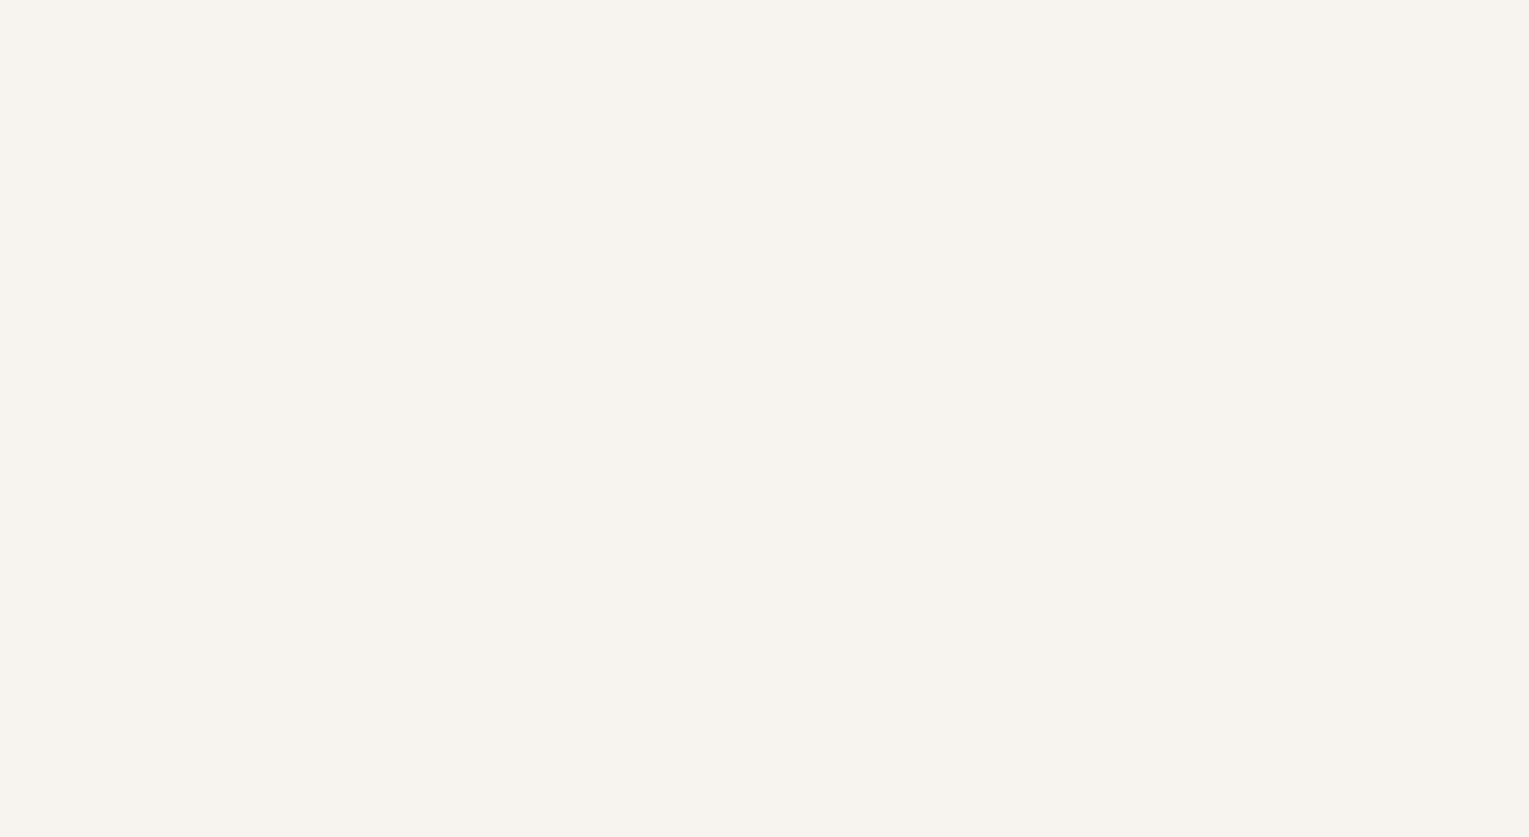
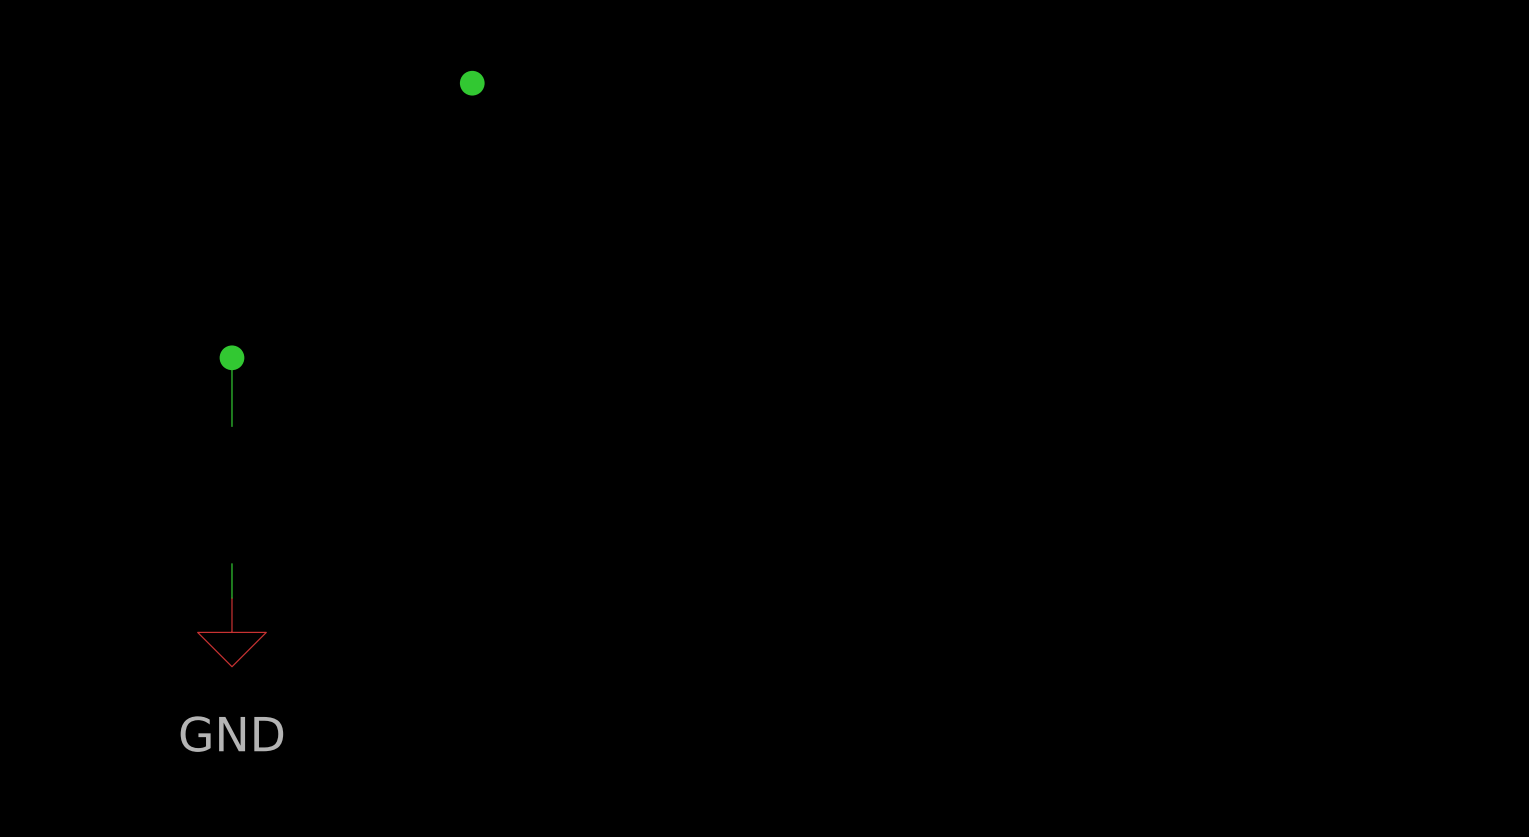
junction: none -> (472, 83)
wire: none -> (231, 357) (231, 426)
junction: none -> (231, 357)
wire: none -> (231, 563) (231, 598)
power symbol: none -> GND (231, 632)

